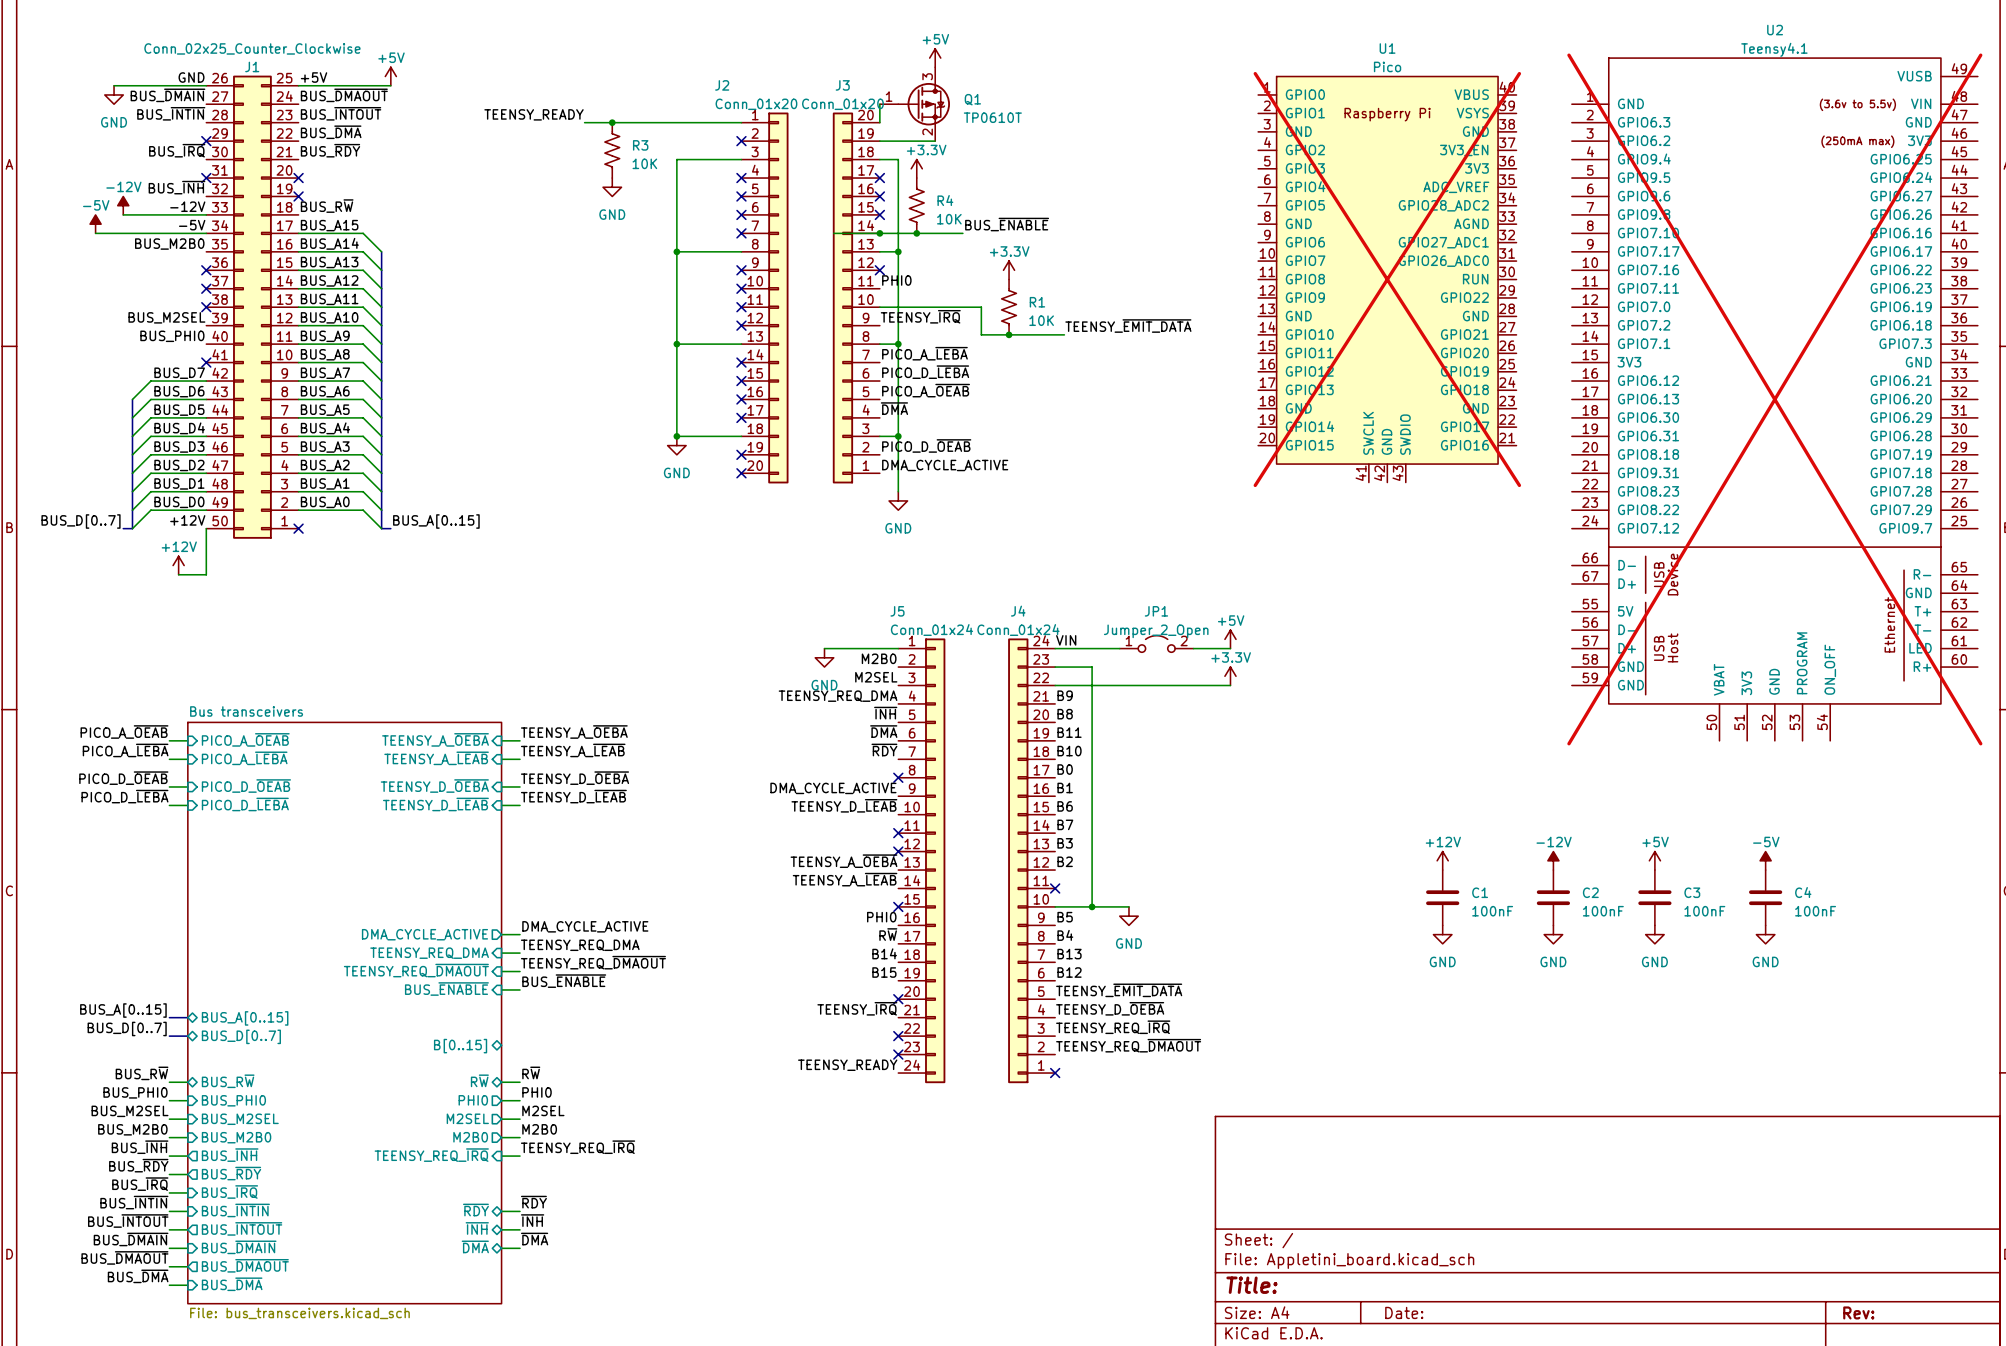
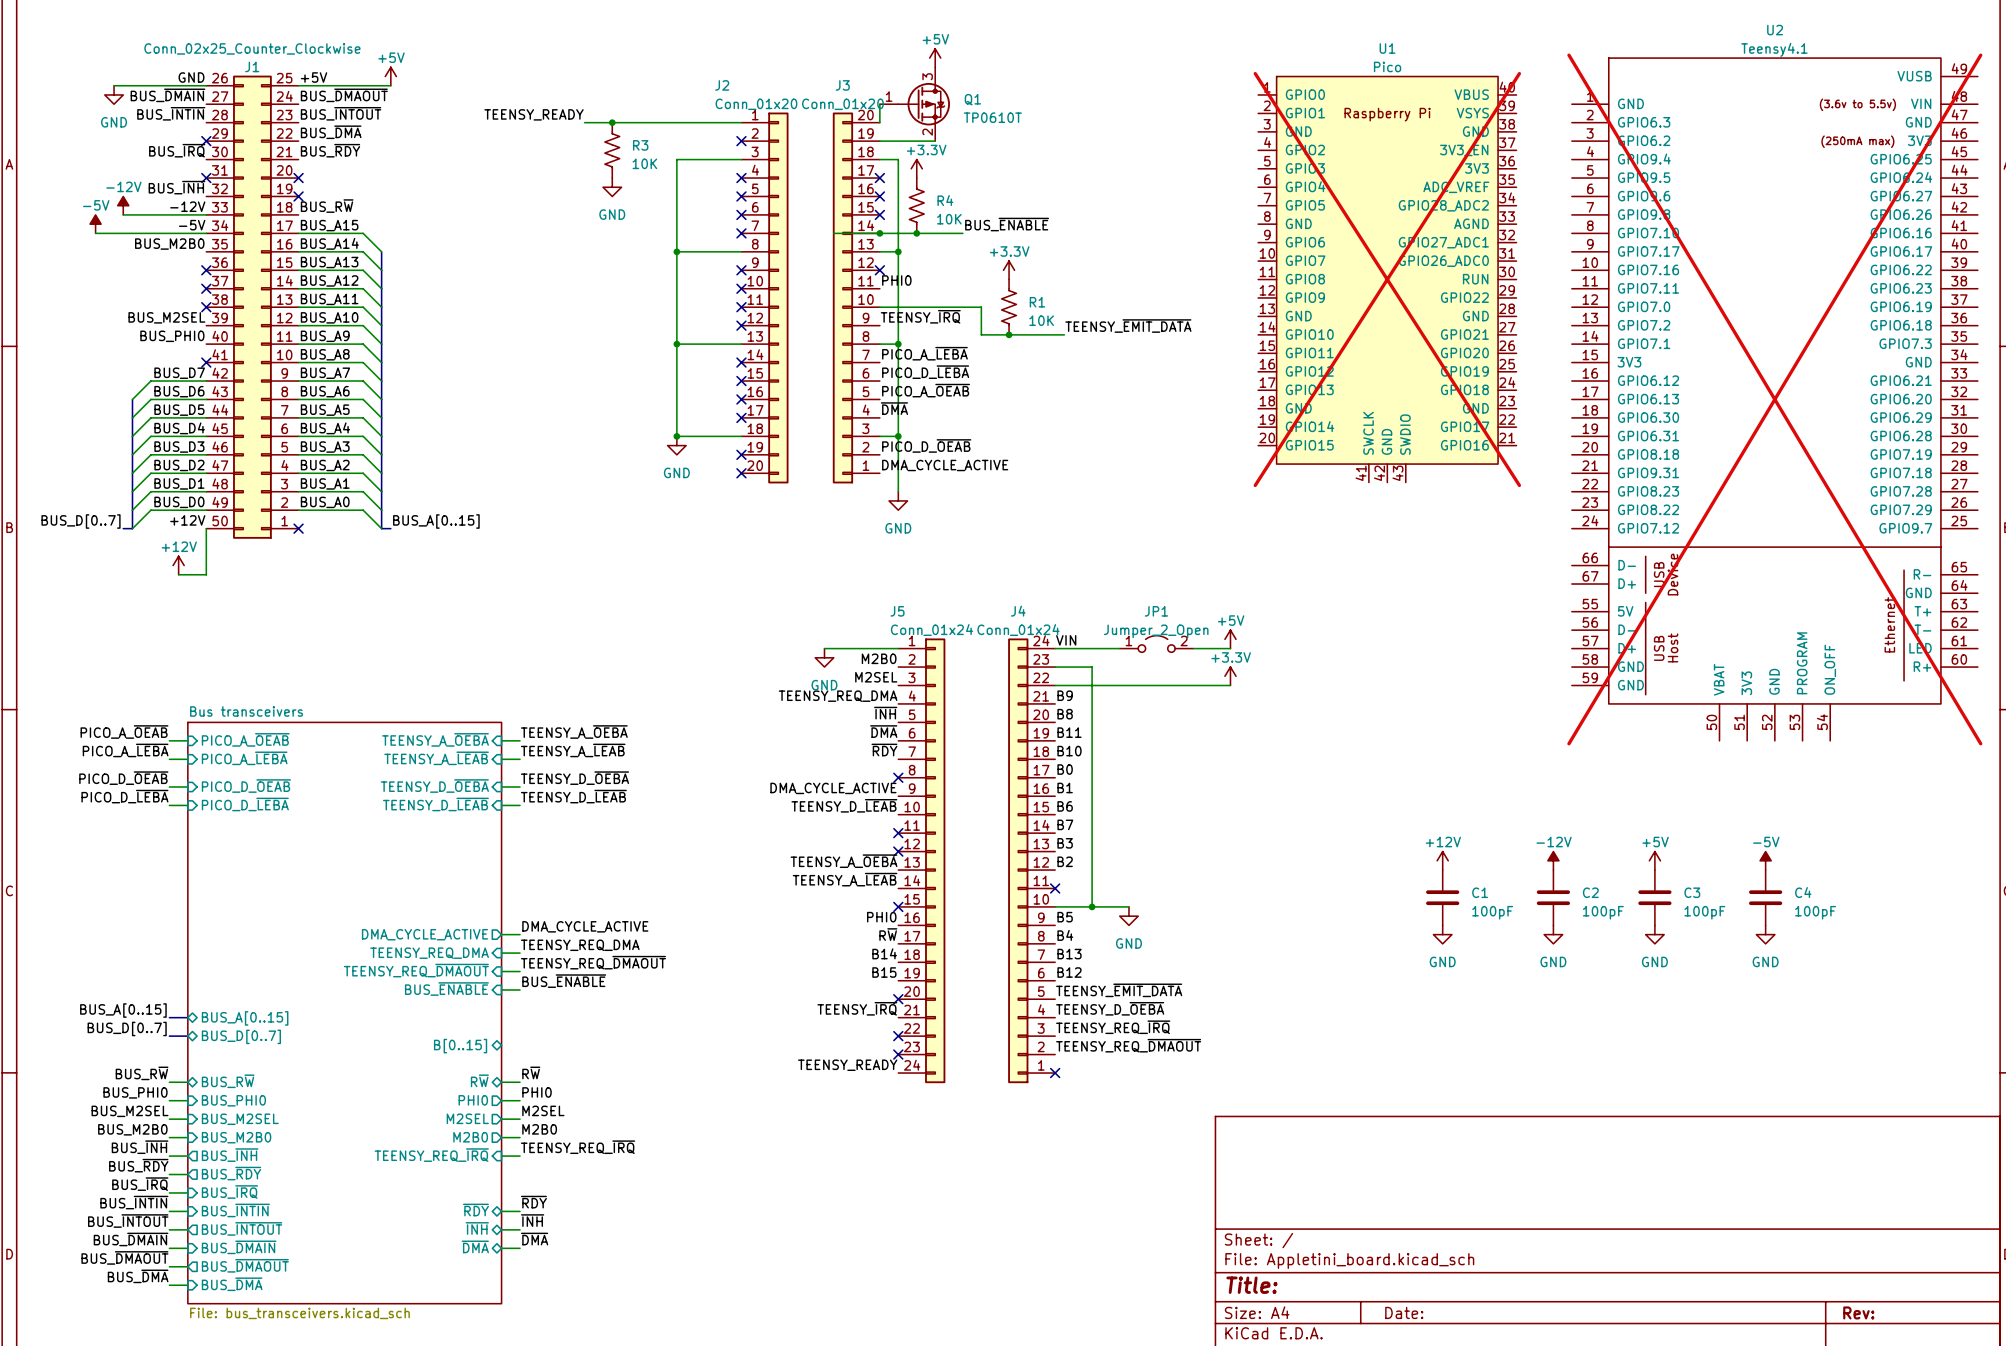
C1 value: 100nF (1492, 911) -> 100pF (1492, 912)
C2 value: 100nF (1603, 911) -> 100pF (1603, 912)
C3 value: 100nF (1704, 911) -> 100pF (1704, 912)
C4 value: 100nF (1815, 911) -> 100pF (1815, 912)

